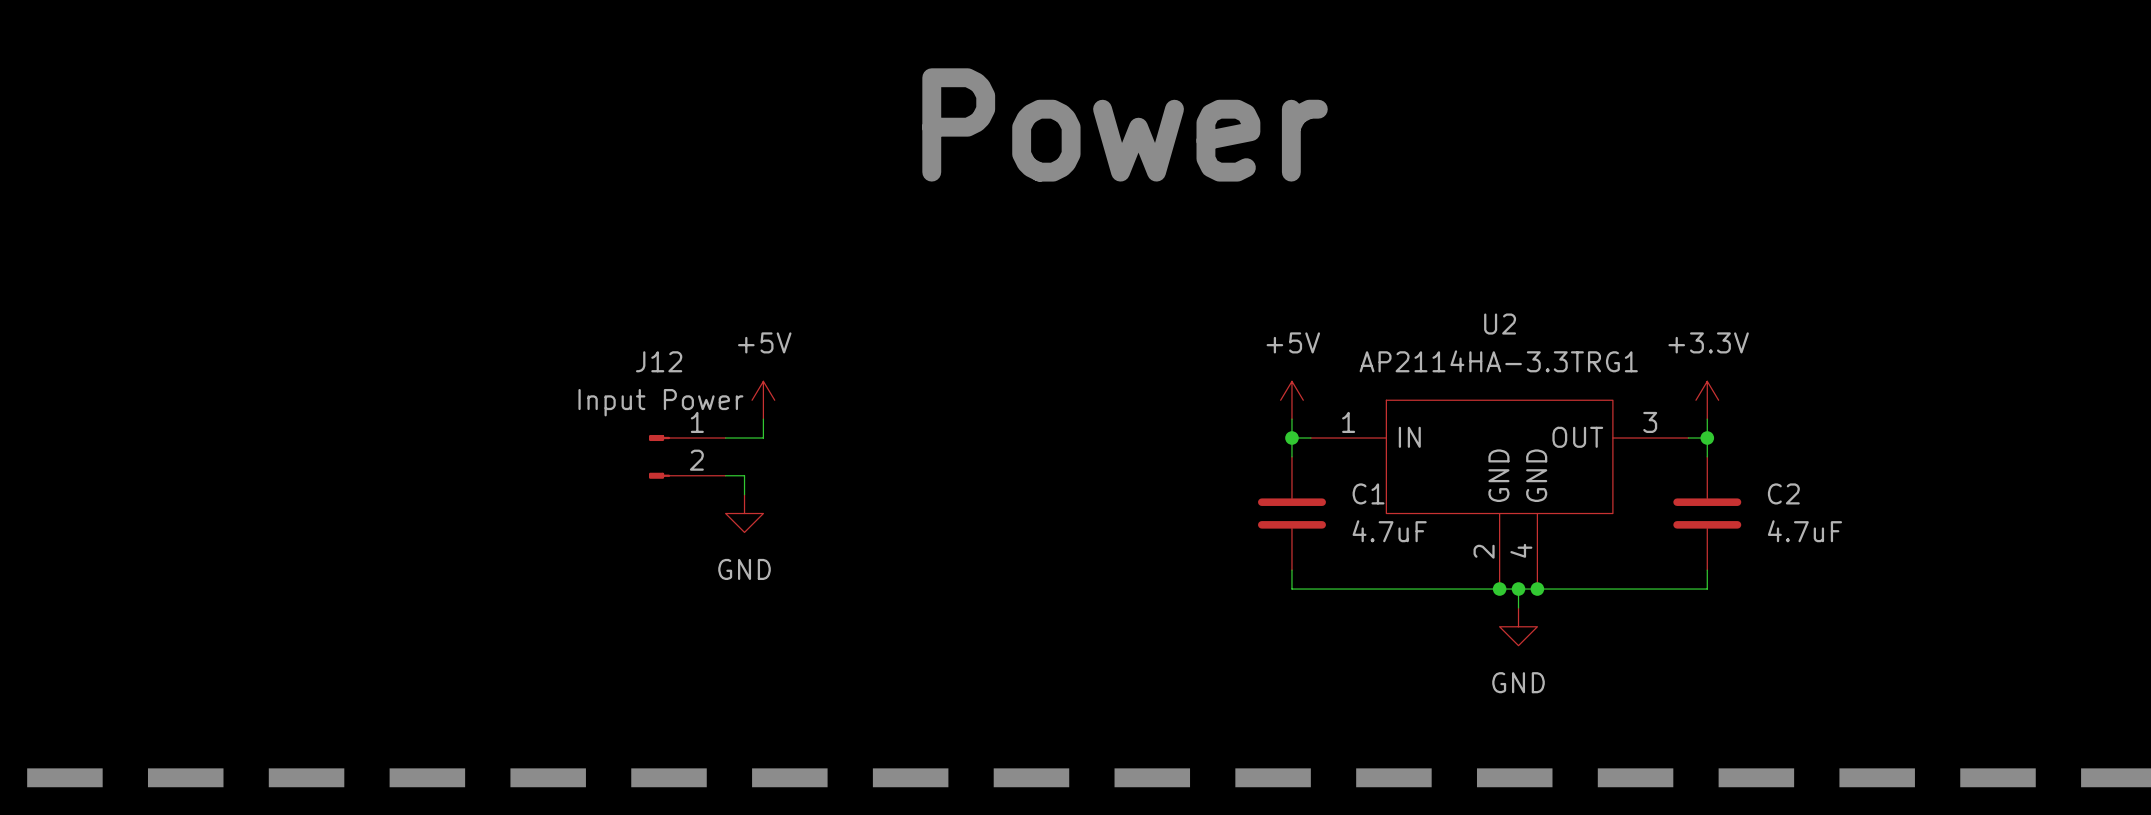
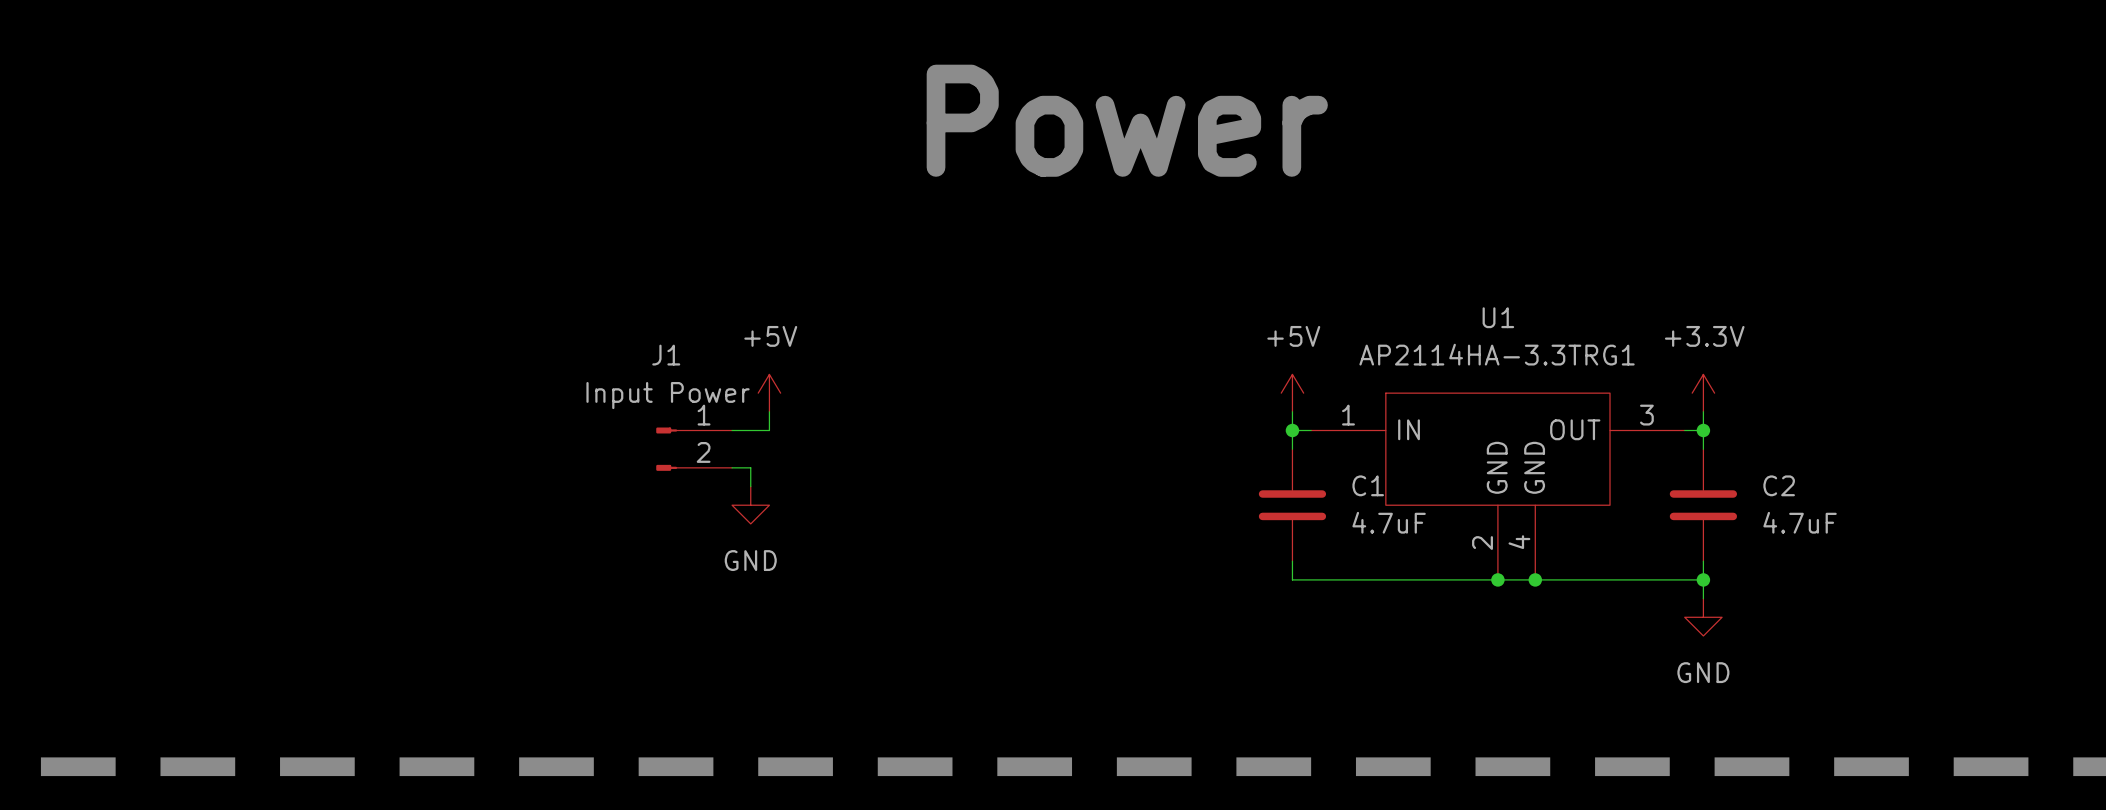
U2 name: U2 (1500, 324) -> U1 (1498, 317)
J12 name: J12 (659, 361) -> J1 (666, 355)
wire: (1518, 589) (1518, 607) -> (1703, 579) (1703, 598)
junction: (1518, 589) -> none
junction: none -> (1703, 579)
power symbol position: GND (1518, 626) -> GND (1703, 617)

